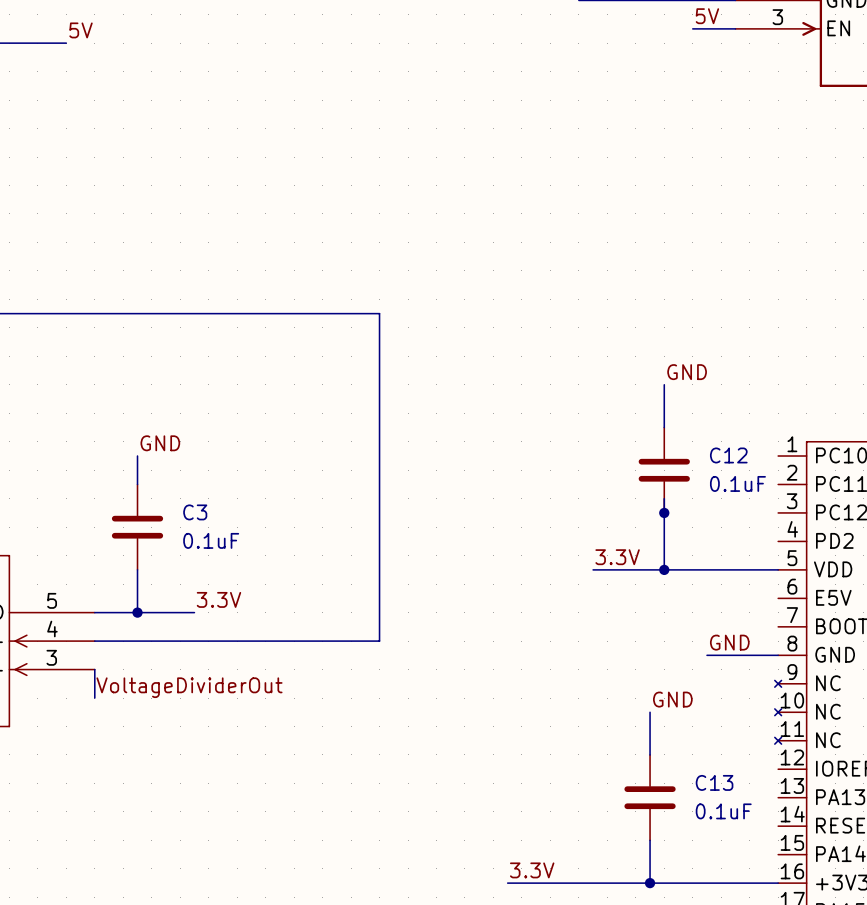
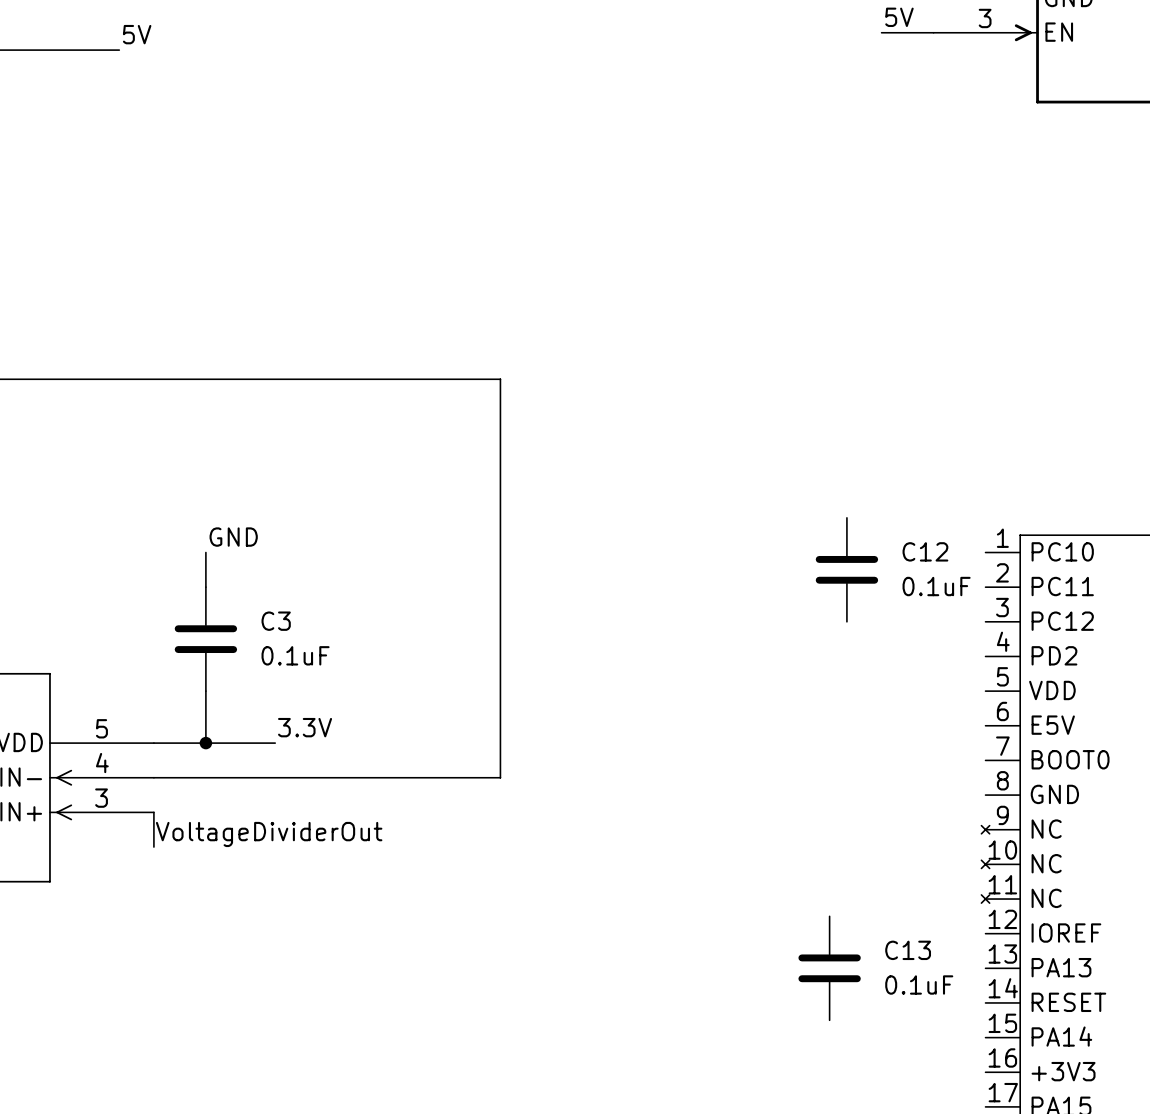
label: GND (687, 372) -> none
wire: (664, 384) (664, 427) -> none
wire: (664, 498) (664, 569) -> none
junction: (664, 512) -> none
label: 3.3V (617, 557) -> none
wire: (593, 569) (778, 569) -> none
junction: (664, 569) -> none
label: GND (729, 642) -> none
wire: (706, 655) (778, 655) -> none
label: GND (672, 699) -> none
wire: (650, 712) (650, 754) -> none
wire: (650, 840) (650, 883) -> none
label: 3.3V (532, 870) -> none
wire: (507, 883) (778, 883) -> none
junction: (650, 883) -> none

